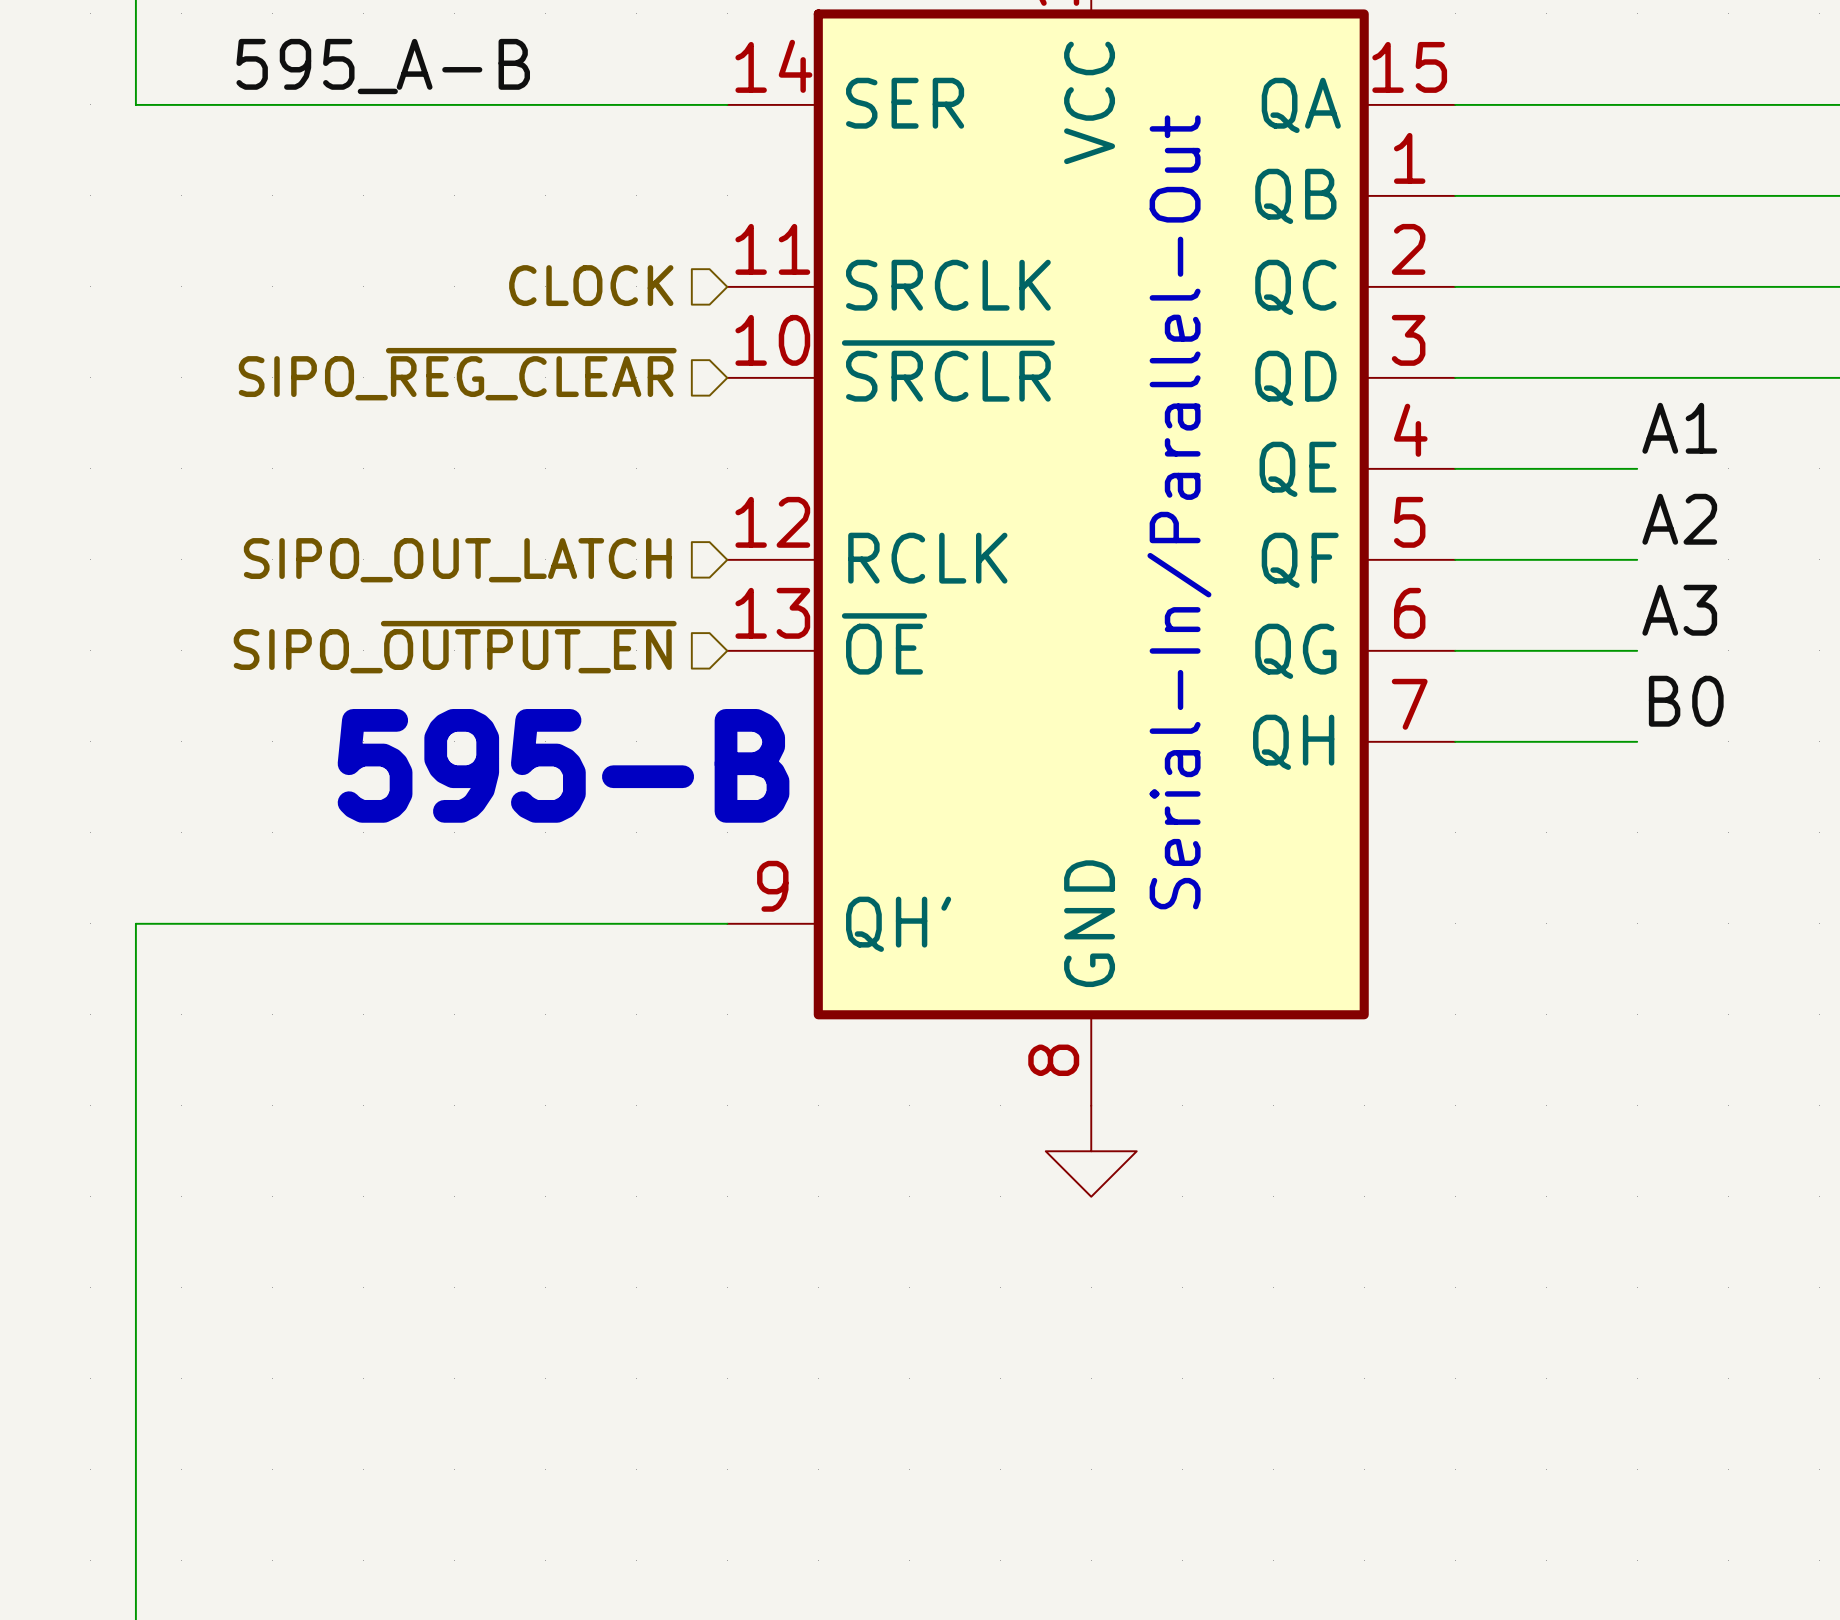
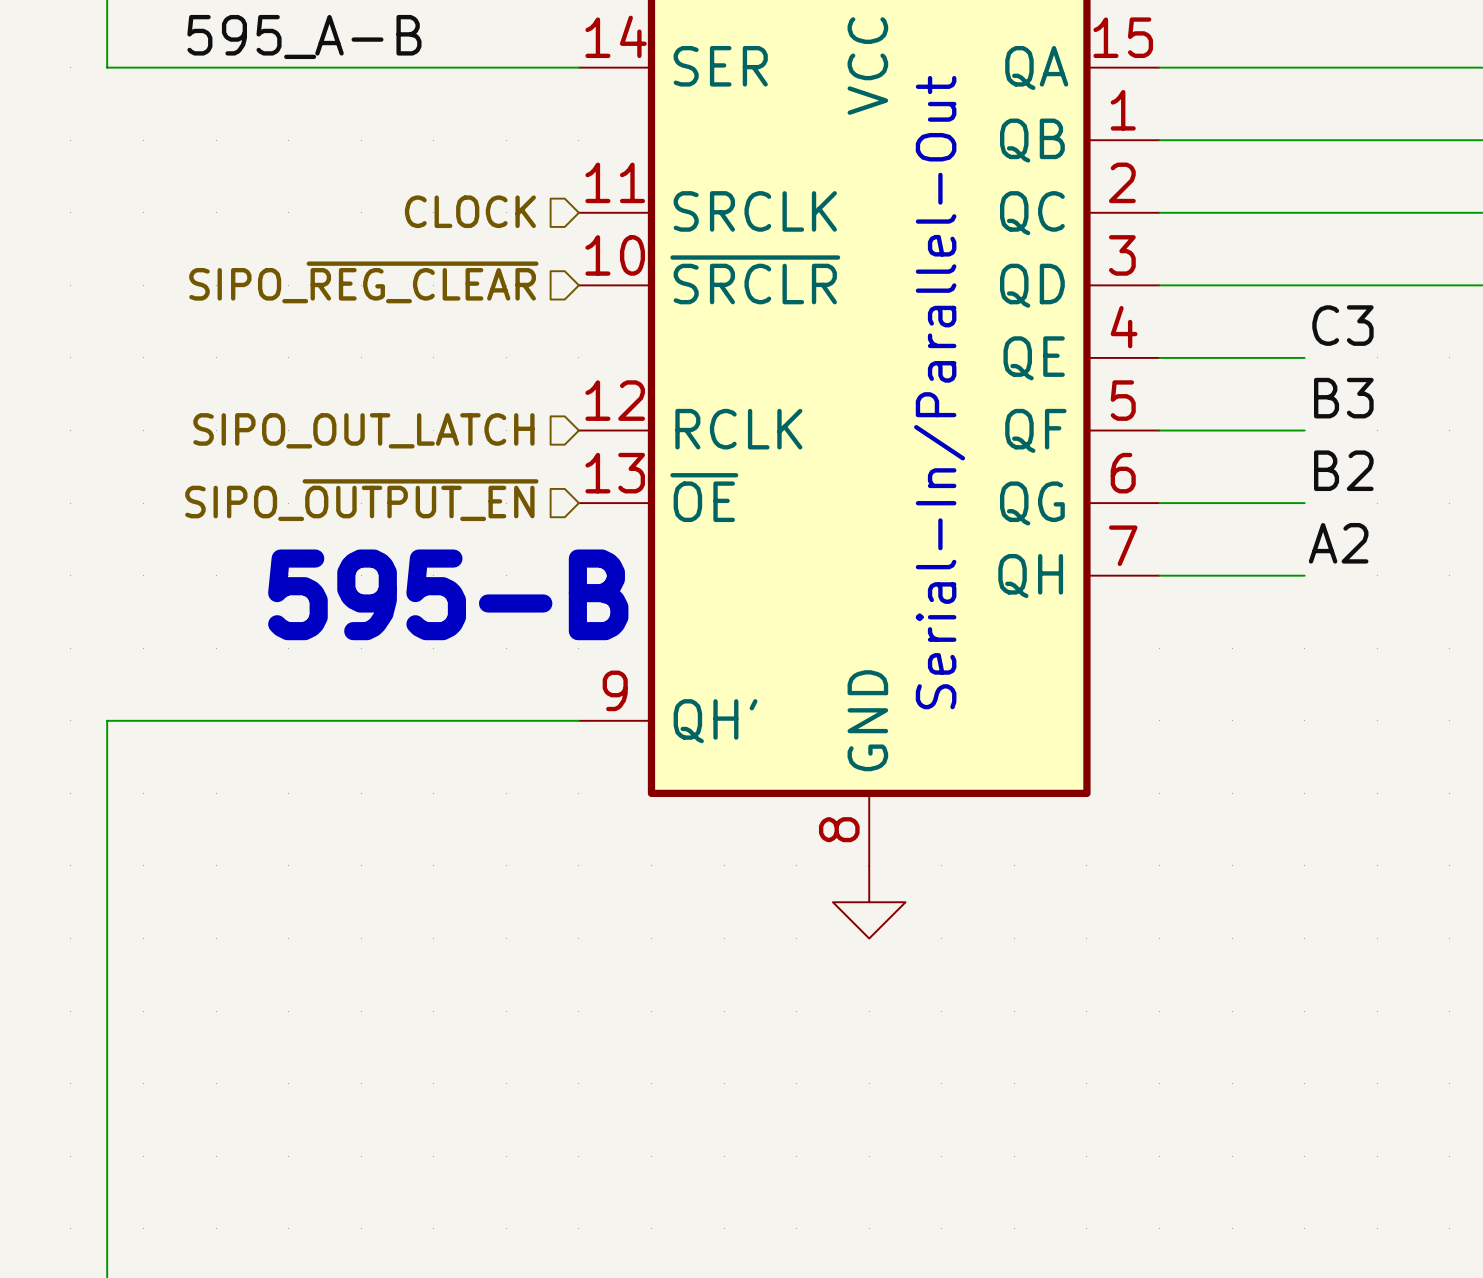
label: A1 (1679, 428) -> C3 (1342, 325)
label: A2 (1679, 519) -> B3 (1343, 398)
label: A3 (1679, 610) -> B2 (1343, 470)
label: B0 (1686, 701) -> A2 (1338, 543)

